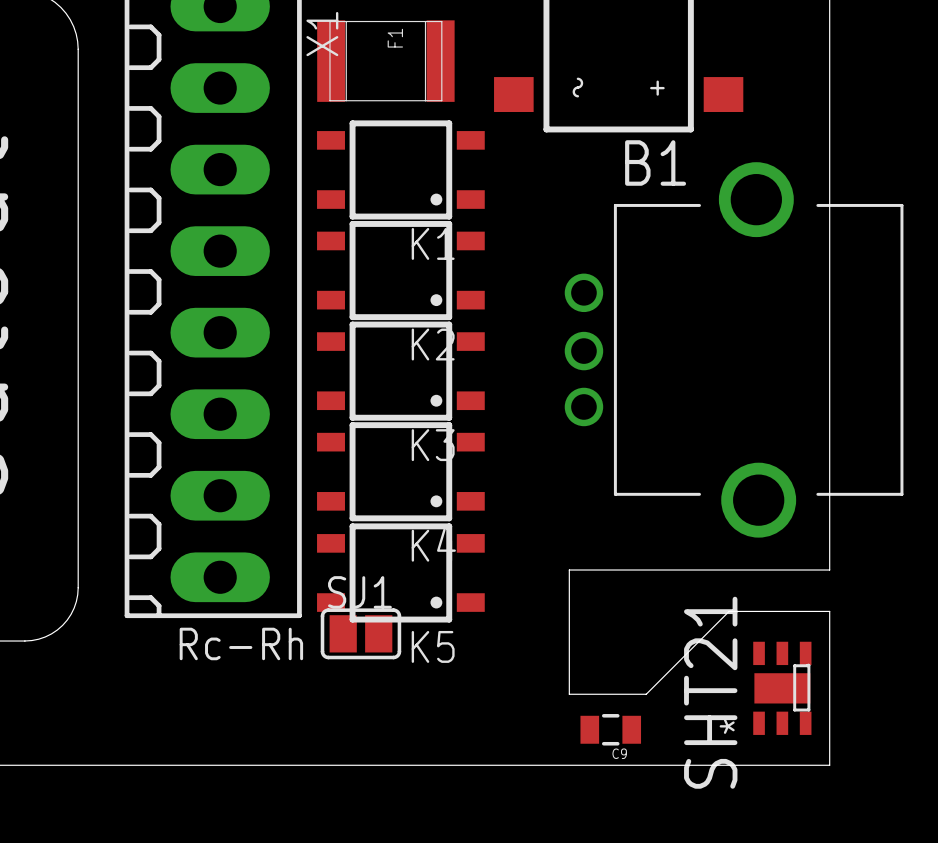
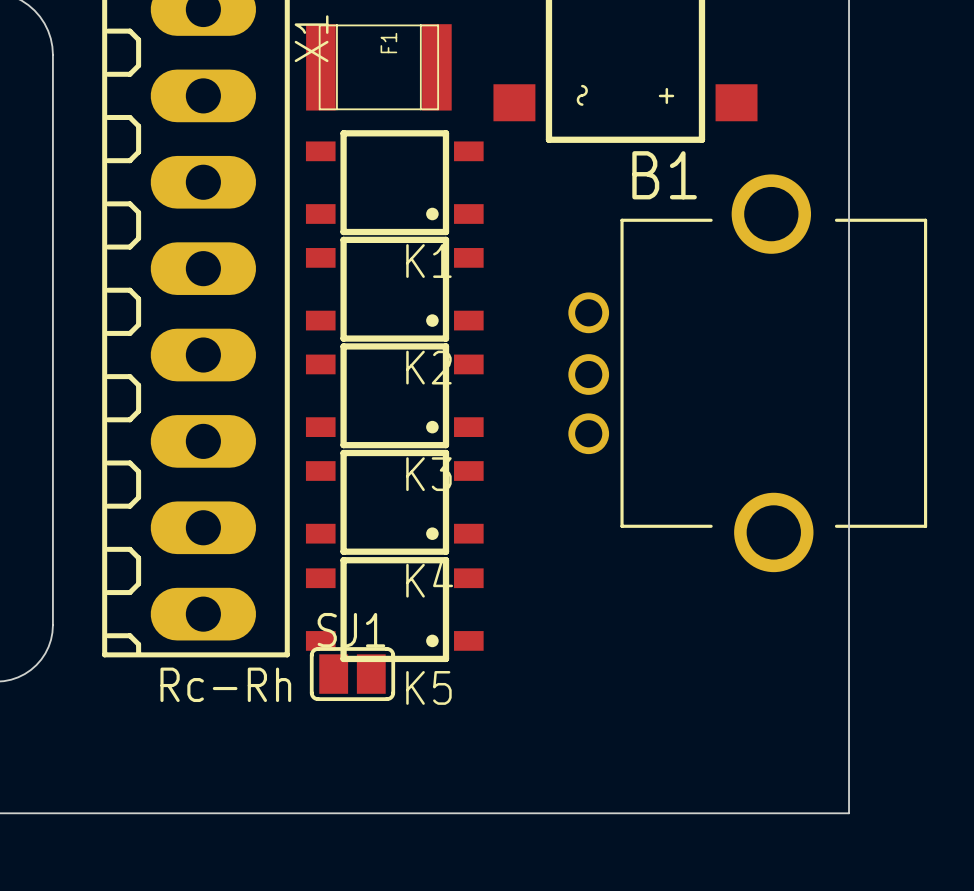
board edge: (829, 570) (569, 570) (569, 694) (646, 694) (729, 611) (829, 611) -> (849, 606) (849, 650)
SHT21: (782, 688) -> none
C9: (610, 729) -> none

